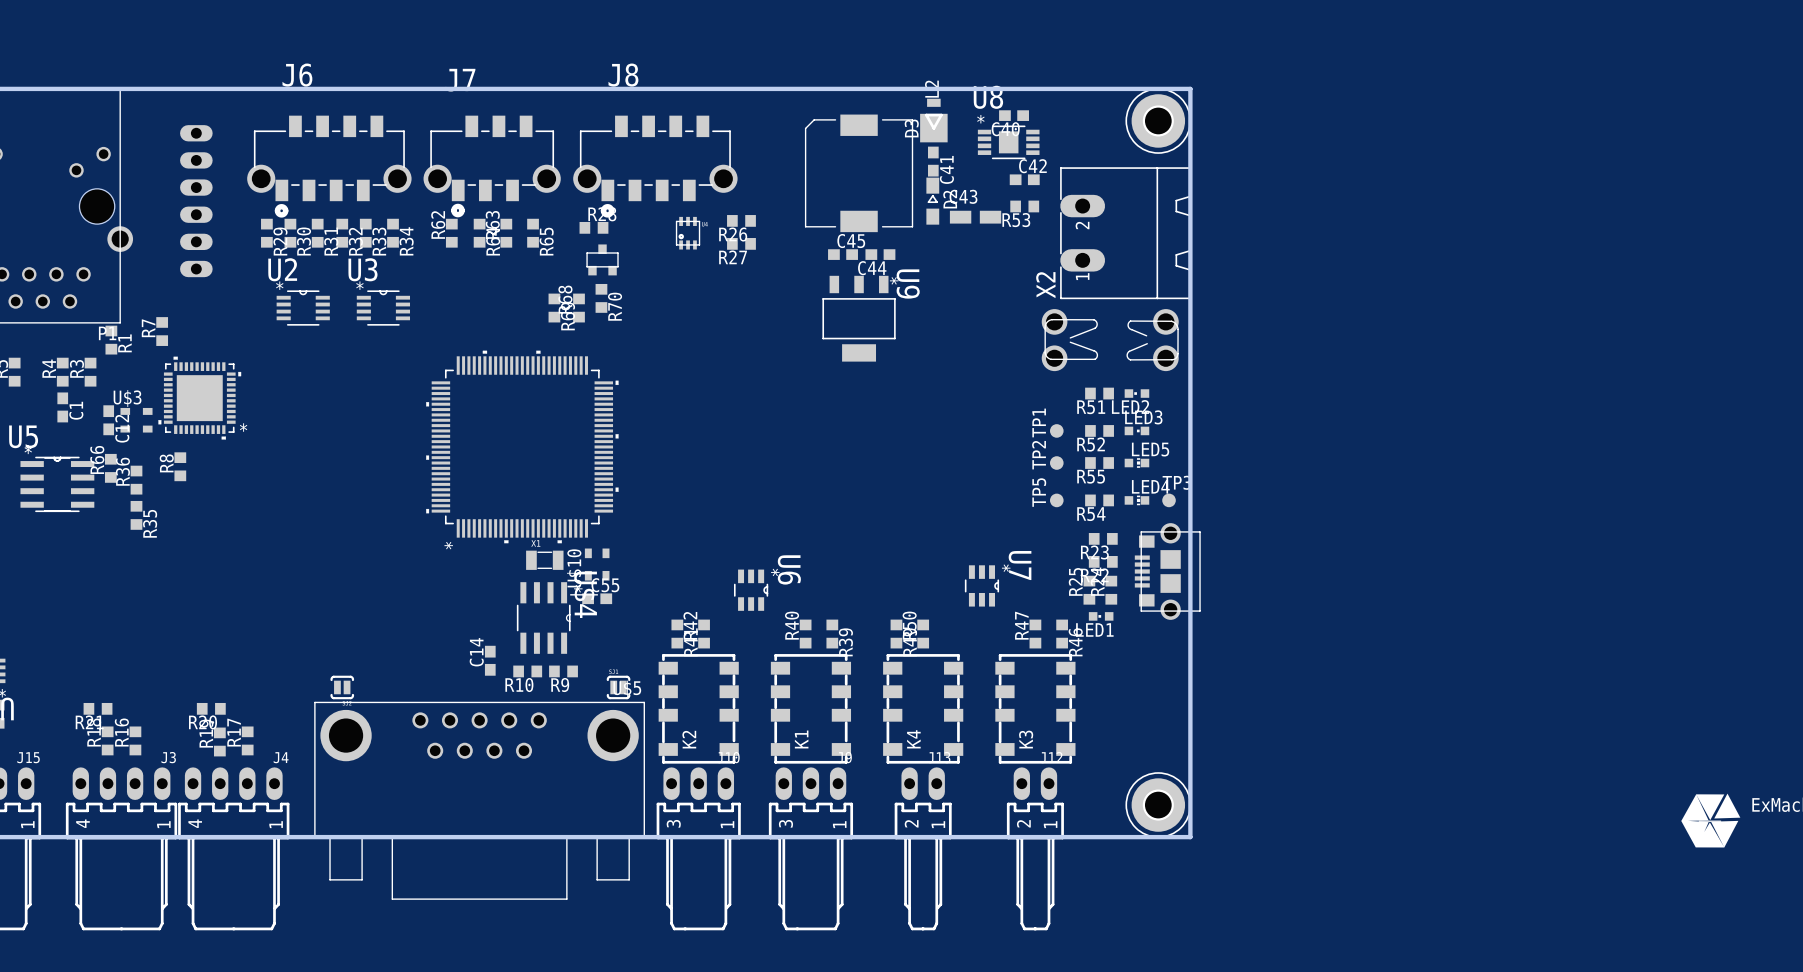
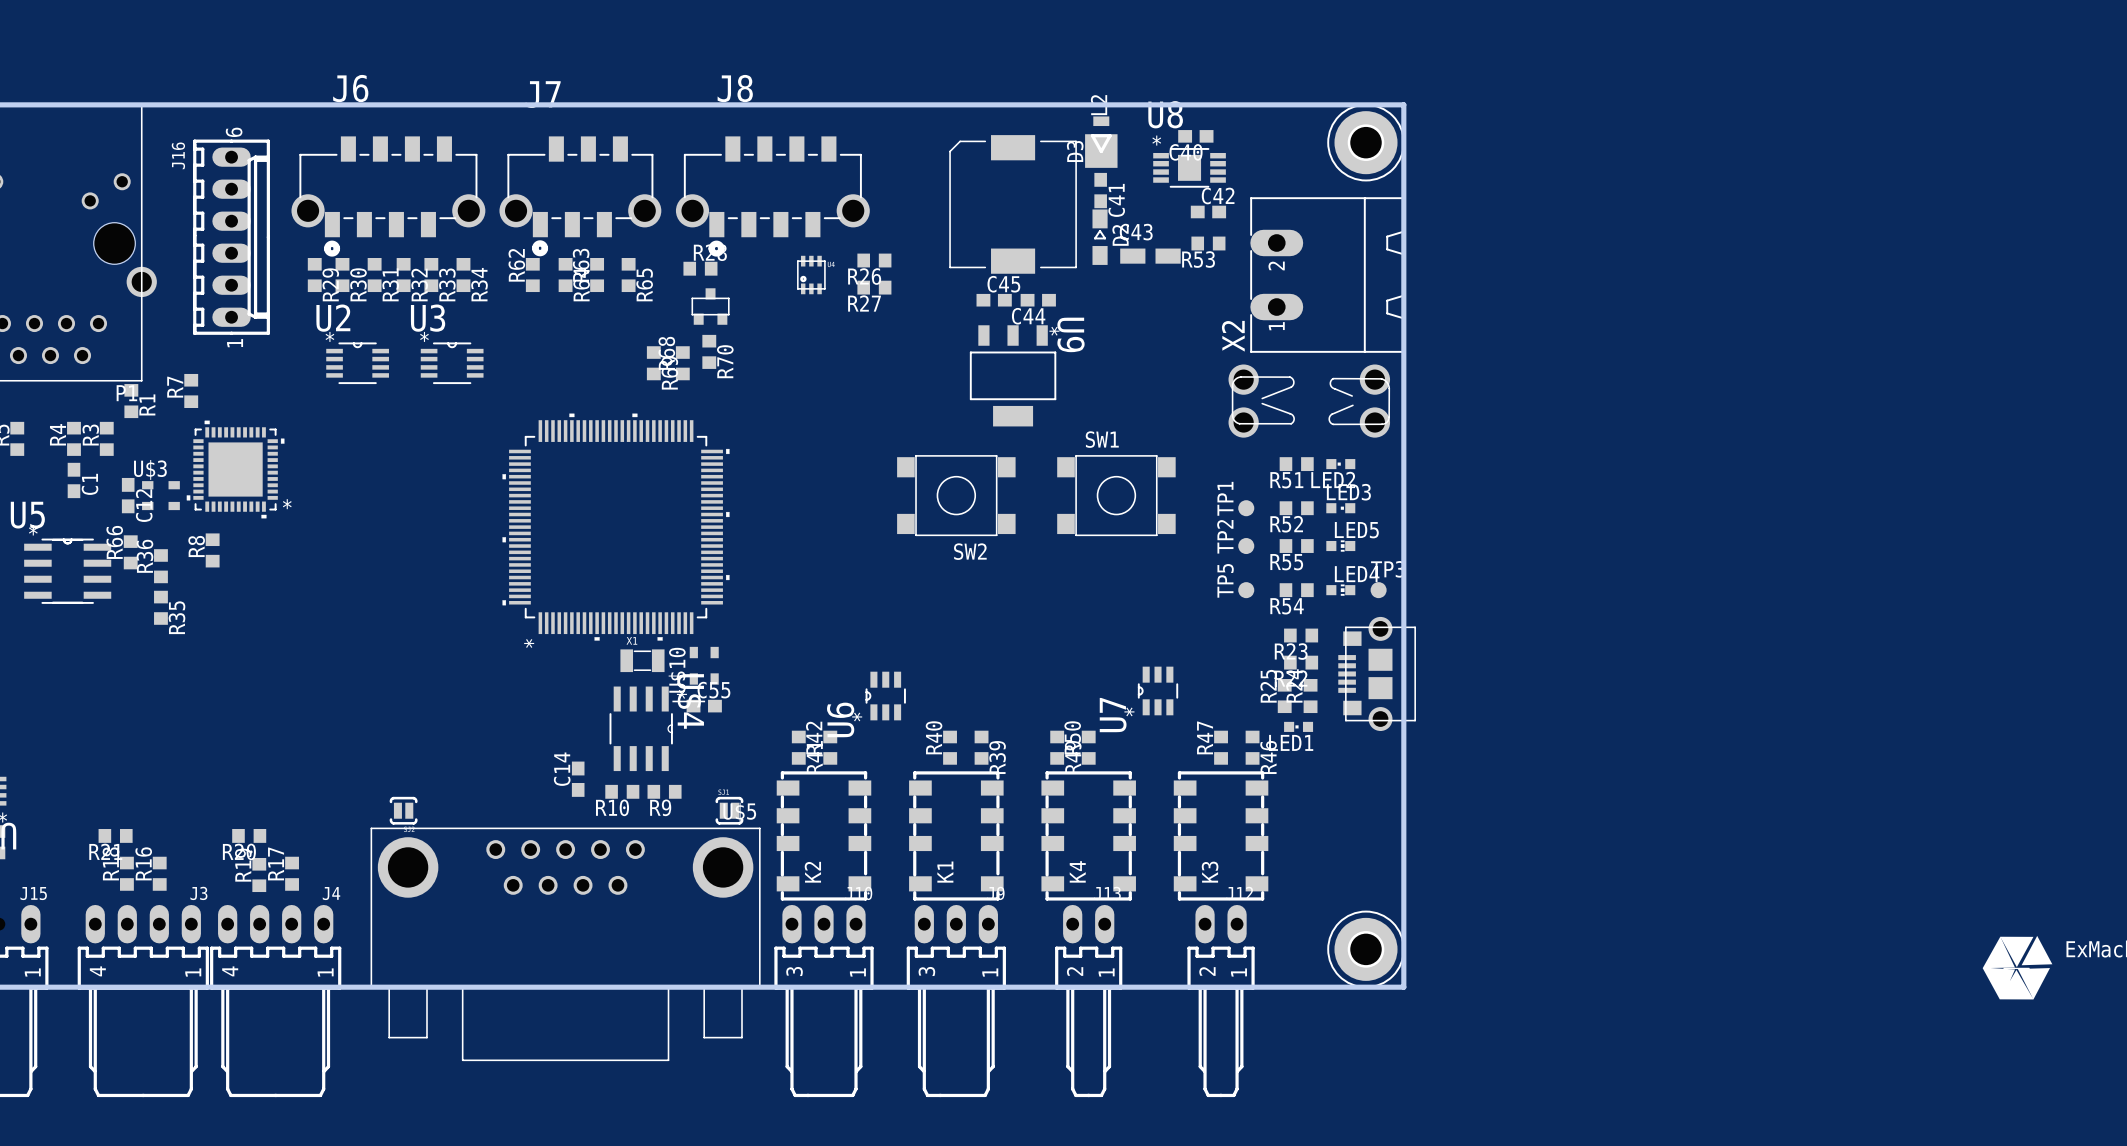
J16 side: bottom (196, 201) -> top (231, 237)
SW2: none -> (956, 495)
SW1: none -> (1116, 495)
U7 rotation: 0° (981, 585) -> 180° (1158, 690)
U6 rotation: 0° (751, 590) -> 180° (885, 696)

